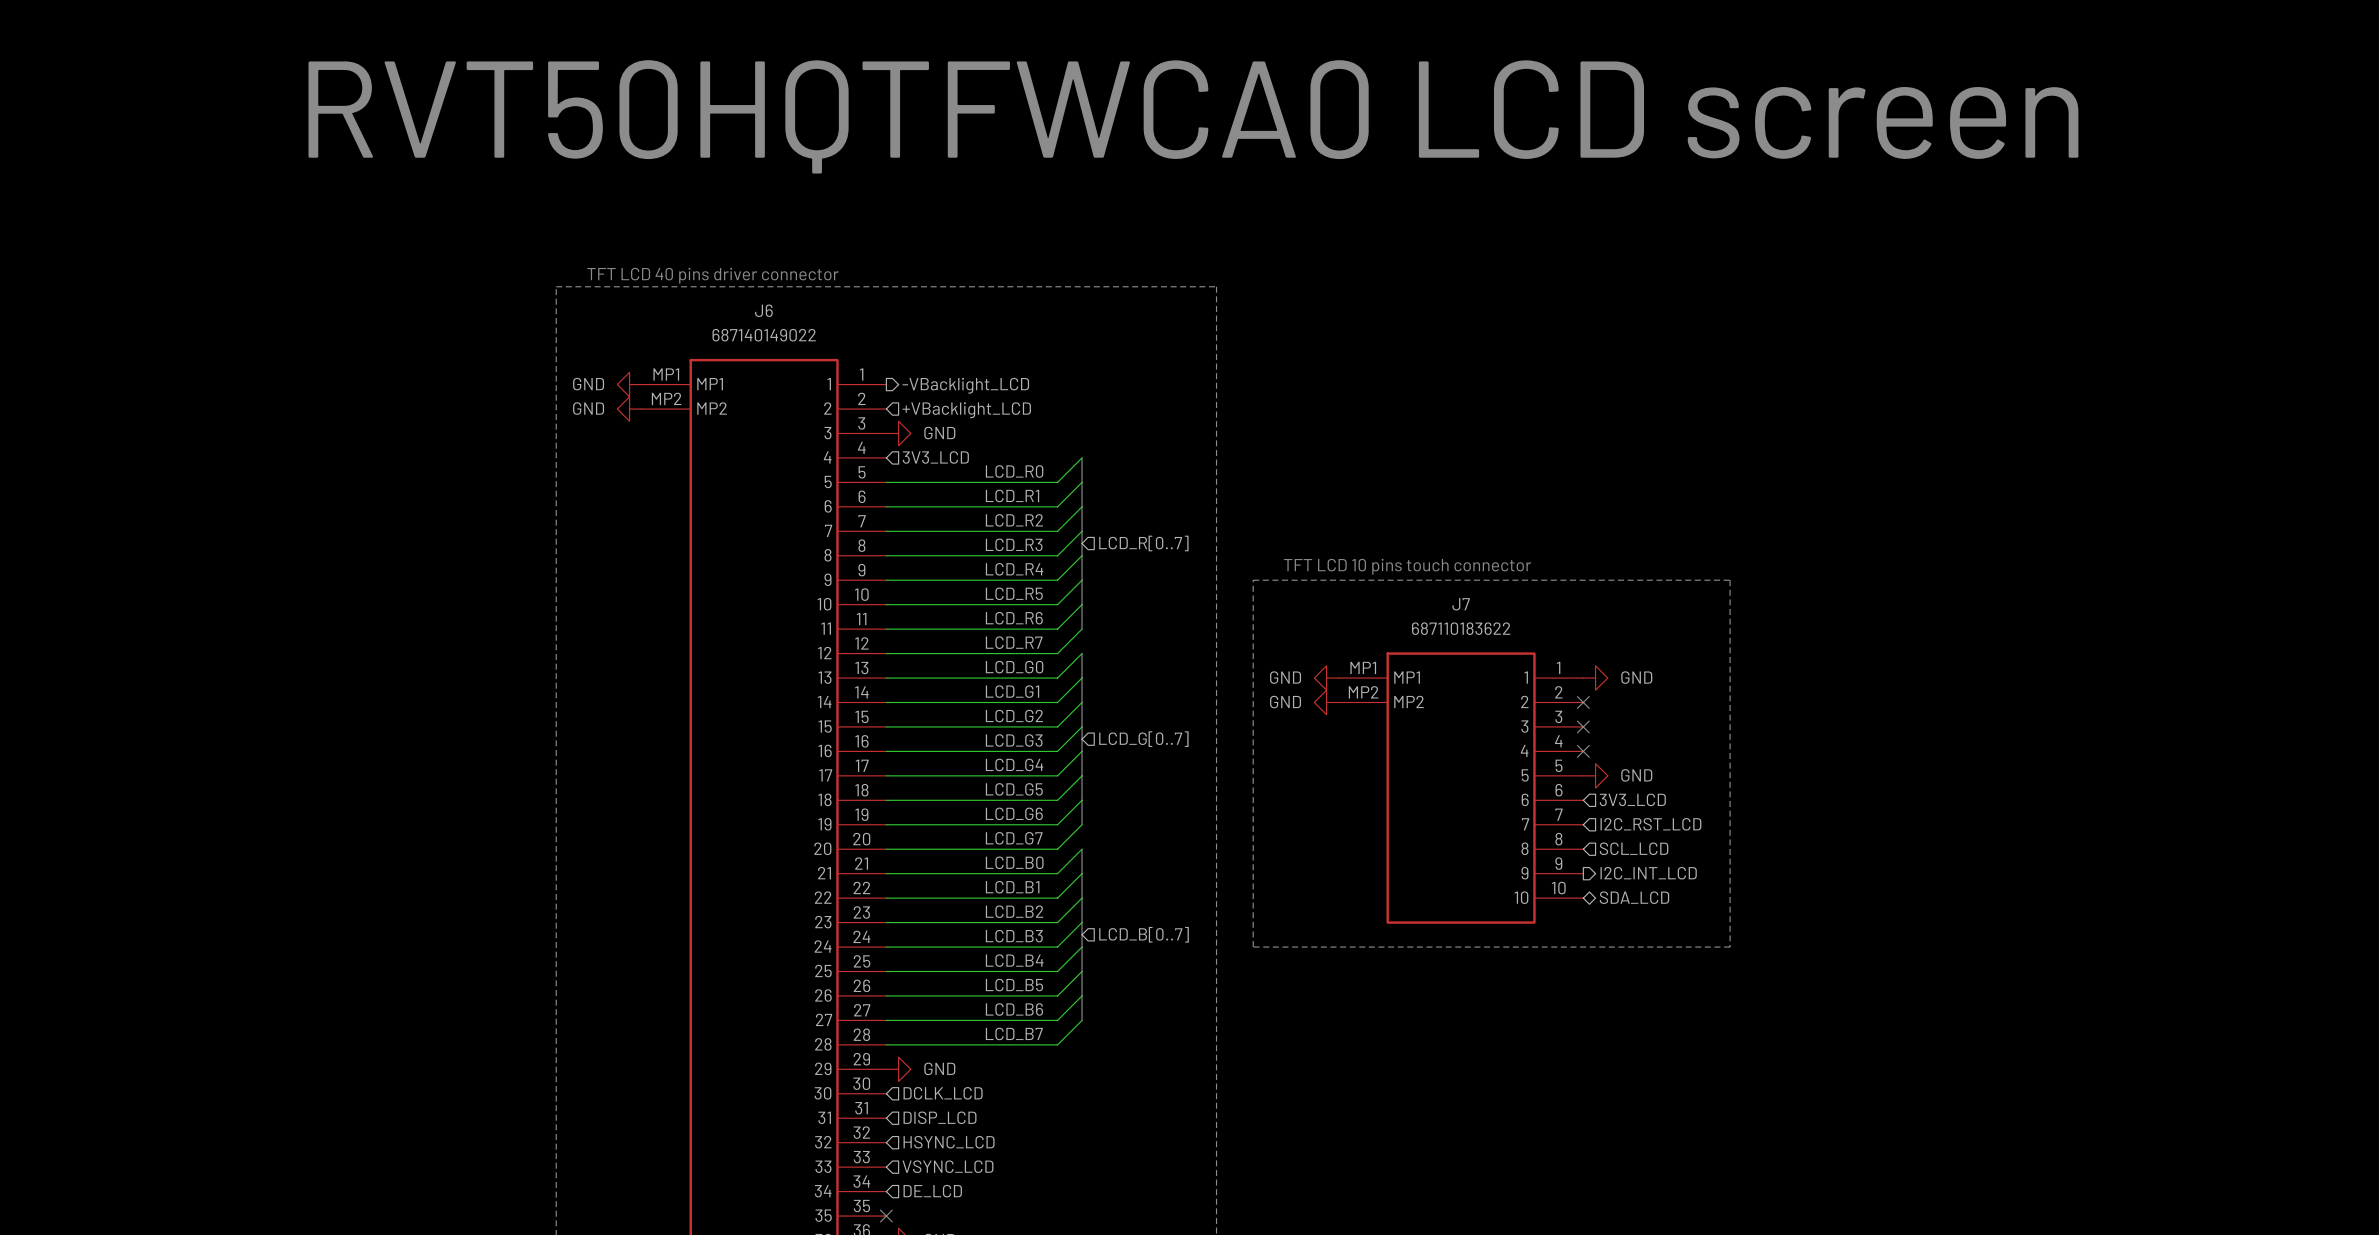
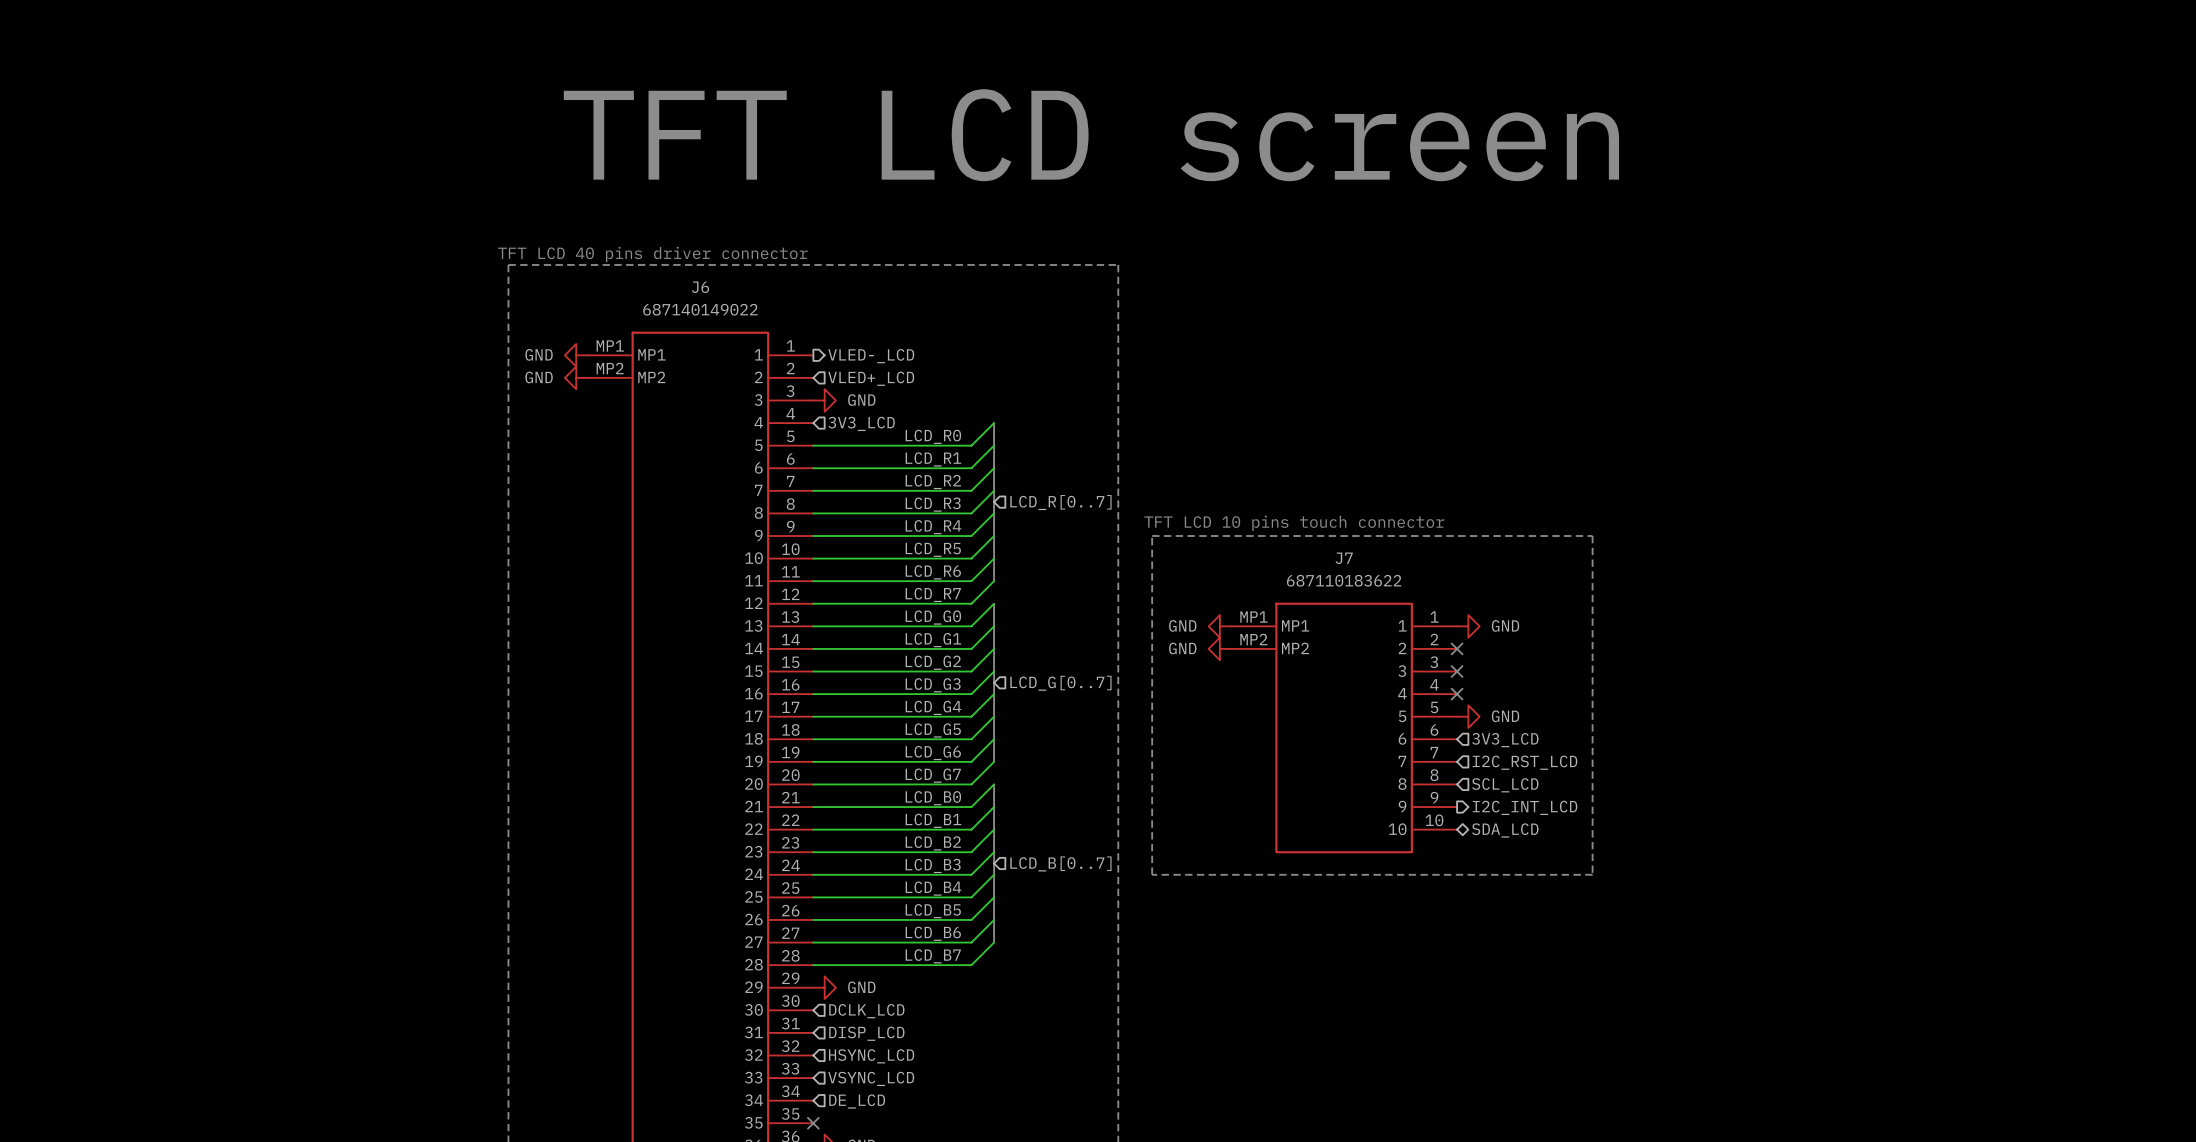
text: RVT50HQTFWCA0 LCD screen (1193, 116) -> TFT LCD screen (1091, 135)
hierarchical label: -VBacklight_LCD (965, 385) -> VLED-_LCD (871, 356)
hierarchical label: +VBacklight_LCD (966, 410) -> VLED+_LCD (871, 378)

